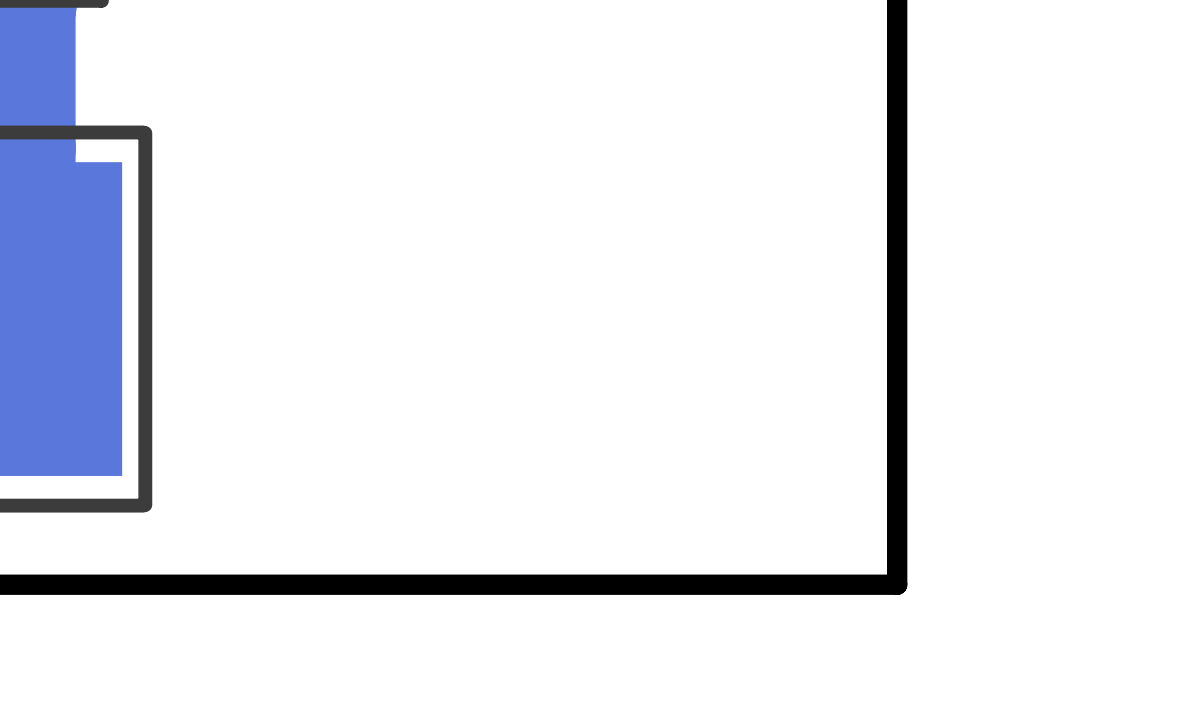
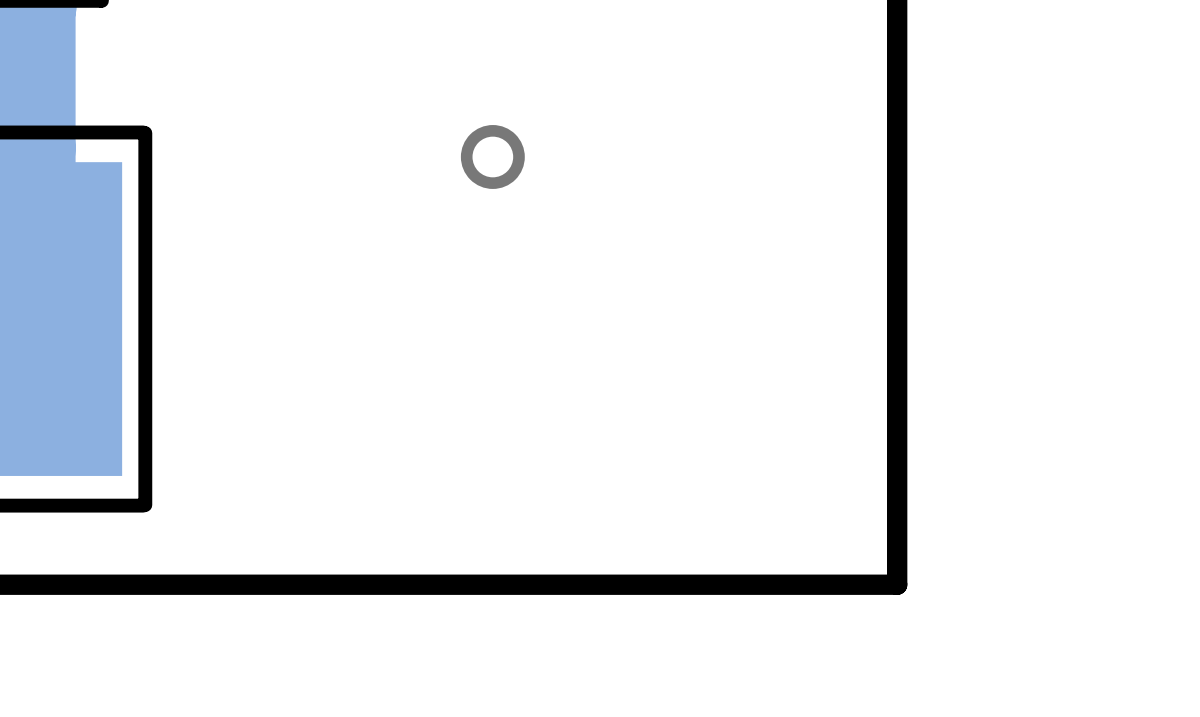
via: none -> (492, 156)

